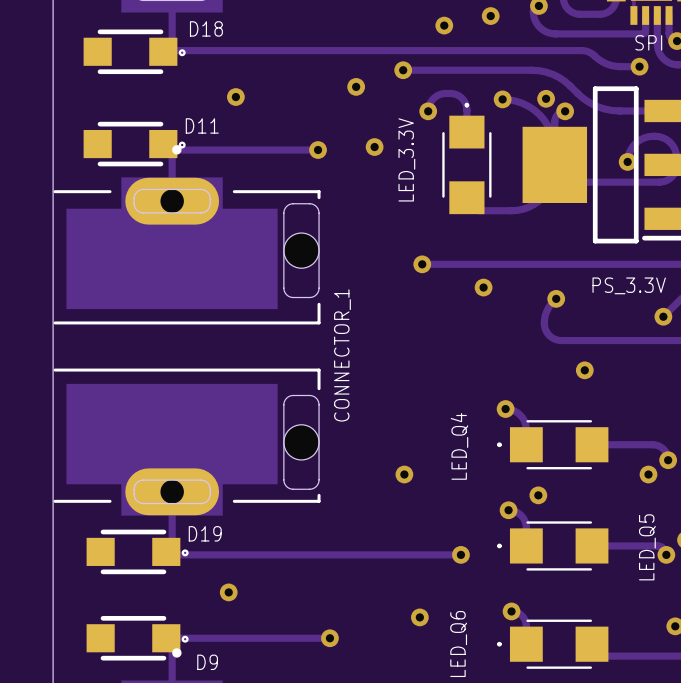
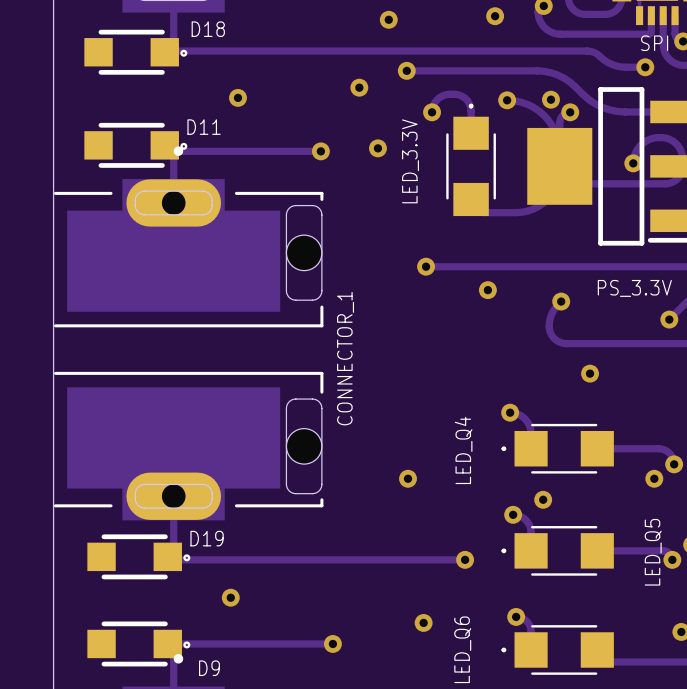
via position: (444, 25) -> (388, 19)

